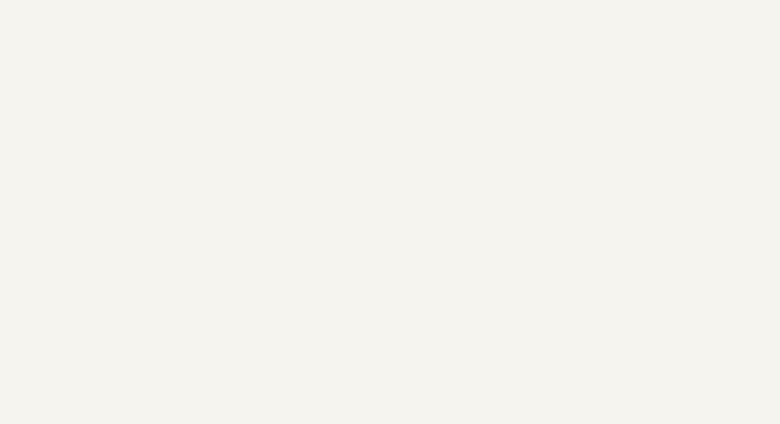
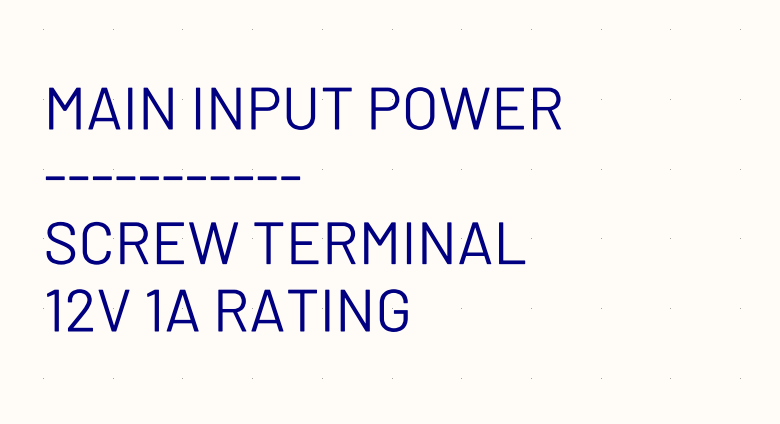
text: none -> MAIN INPUT POWER (305, 108)
text: none -> ----------- (172, 178)
text: none -> SCREW TERMINAL (285, 243)
text: none -> 12V 1A RATING (227, 310)

